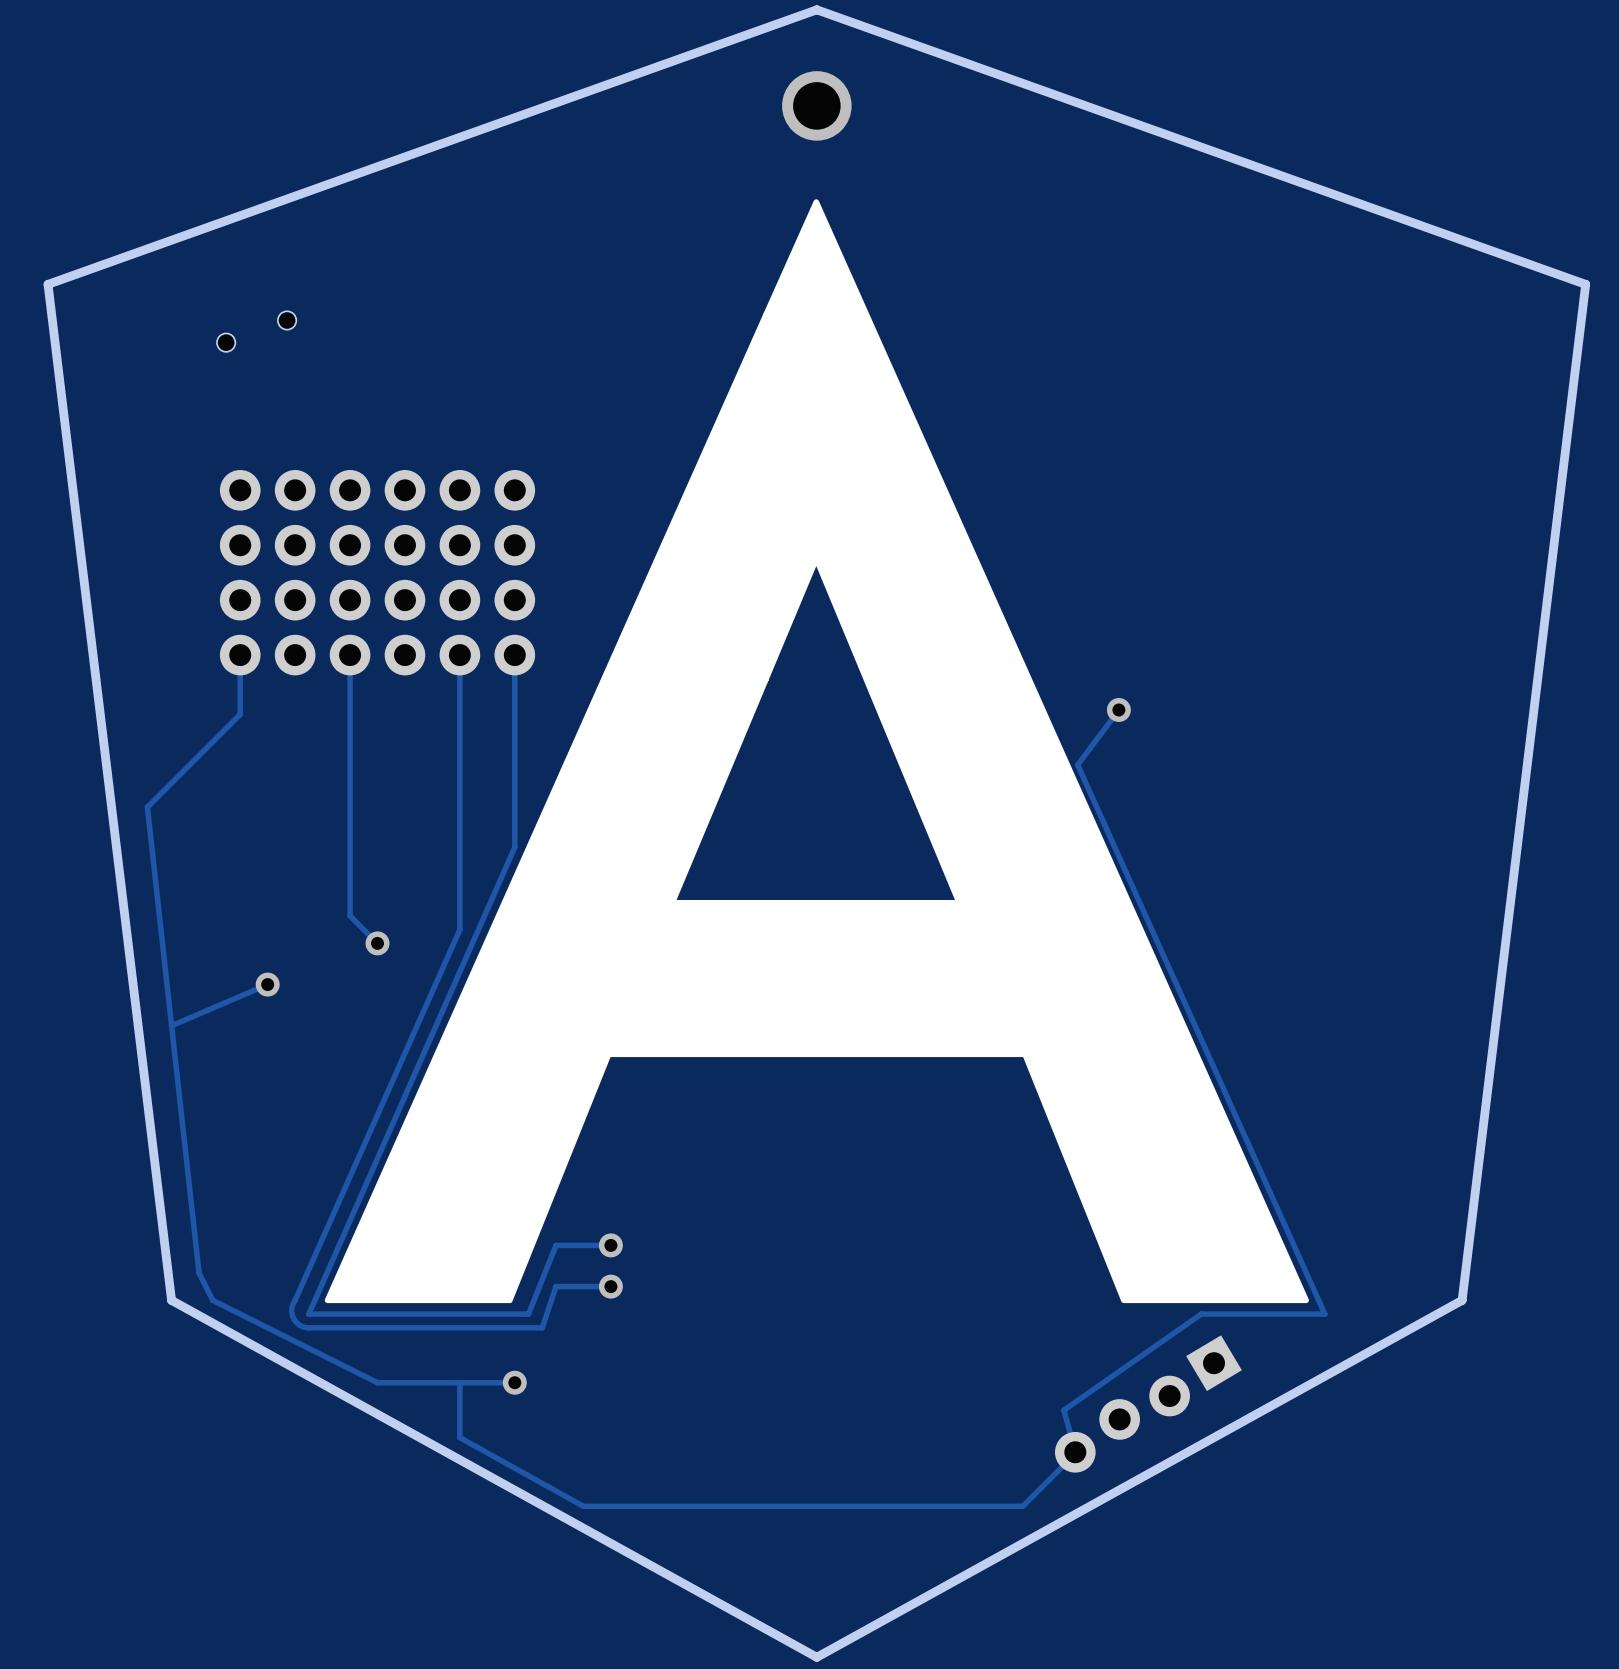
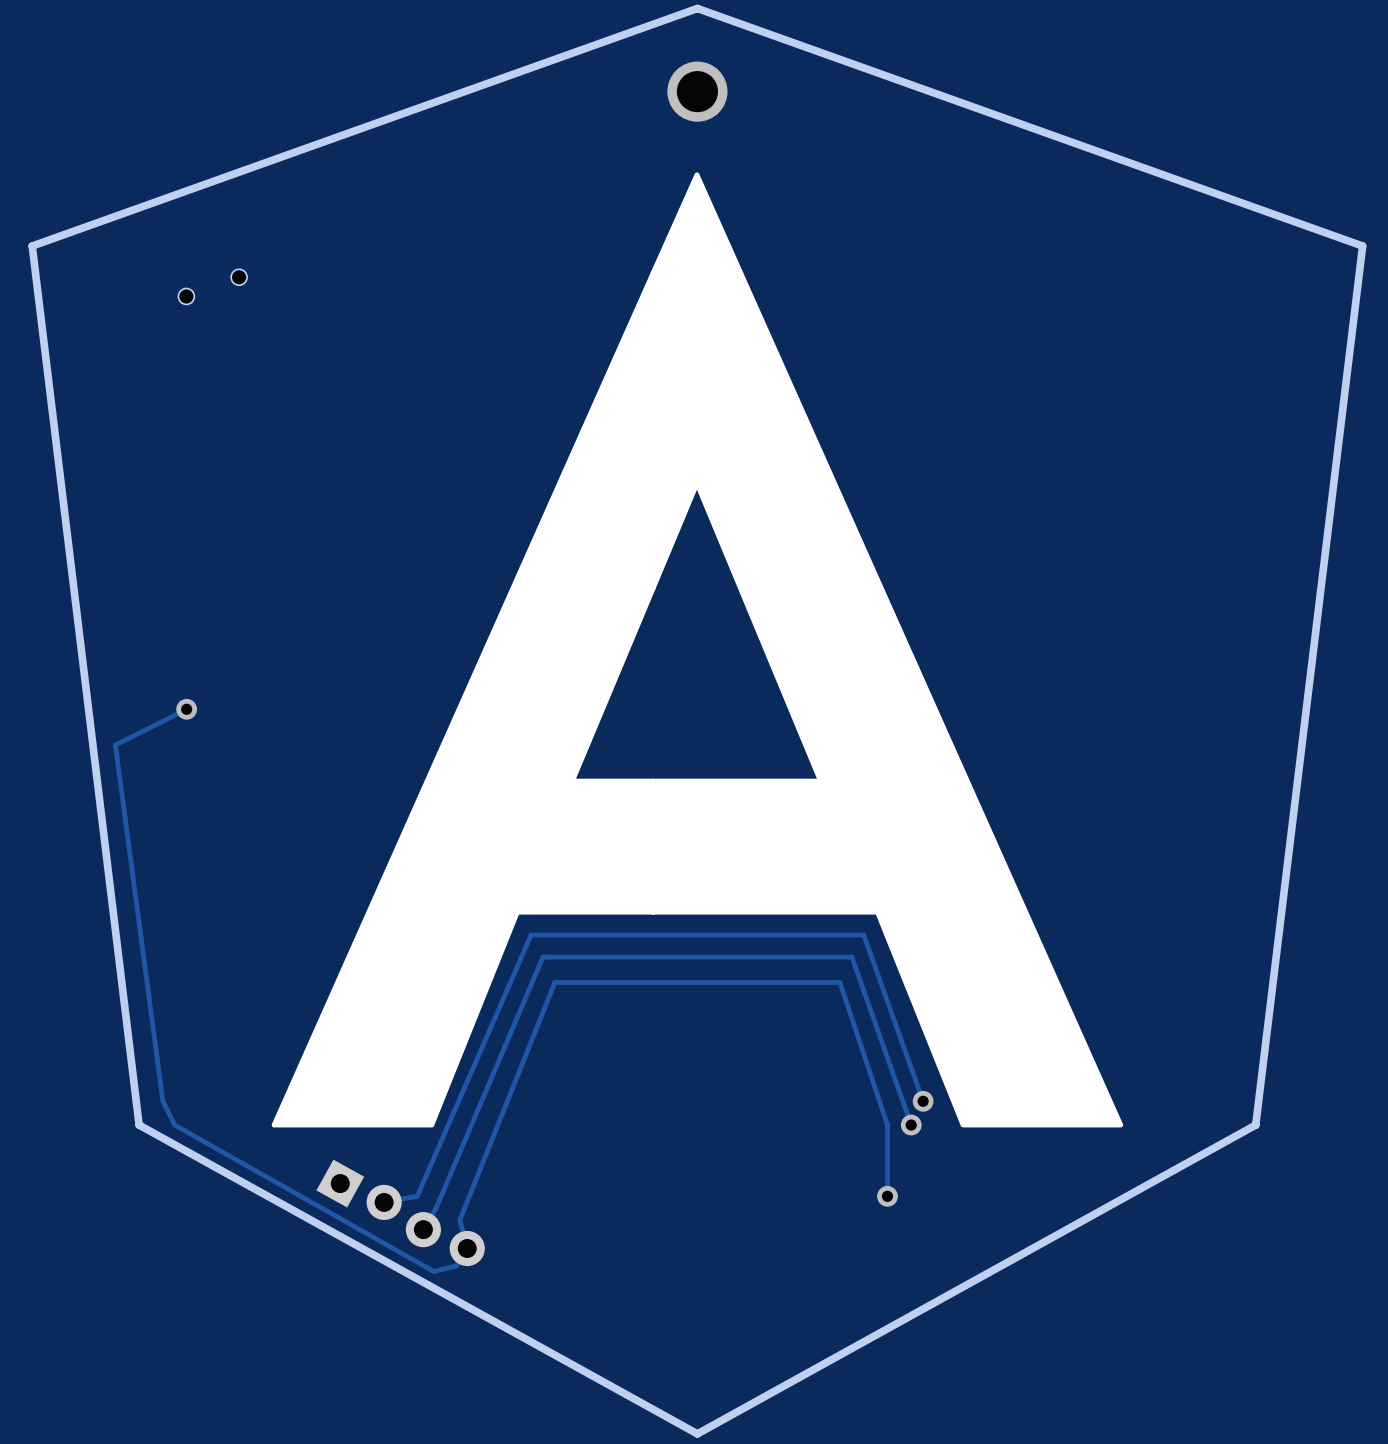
part: (377, 572) -> none
track: (240, 655) (240, 714) (147, 807) (171, 1025) -> none
track: (350, 655) (350, 915) (377, 943) -> none
track: (459, 655) (459, 929) (293, 1304) (292, 1314) (298, 1324) (308, 1327) (542, 1327) (555, 1286) (610, 1286) -> none
track: (514, 655) (514, 847) (308, 1314) (528, 1314) (555, 1245) (610, 1245) -> none
track: (1118, 709) (1077, 764) (1324, 1314) (1201, 1314) (1063, 1410) (1075, 1453) (1022, 1506) (583, 1506) (459, 1437) (459, 1382) -> none
via: (1118, 709) -> none
via: none -> (186, 709)
via: (377, 943) -> none
track: (267, 984) (171, 1025) -> none
via: (267, 984) -> none
track: (171, 1025) (199, 1272) -> (186, 709) (115, 744) (162, 1101)
via: (610, 1245) -> none
track: none -> (923, 1101) (863, 935) (531, 935) (417, 1196) (384, 1202)
via: none -> (923, 1101)
via: (610, 1286) -> none
track: (212, 1300) (377, 1382) (514, 1382) -> (174, 1125) (433, 1271) (456, 1265) (467, 1248) (459, 1220) (554, 982) (839, 982) (887, 1125) (887, 1196)
track: none -> (911, 1125) (851, 957) (543, 957) (436, 1208) (423, 1229)
via: none -> (911, 1125)
via: (514, 1382) -> none
via: none -> (887, 1196)
part: none -> (400, 1212)
part: (1148, 1403) -> none

